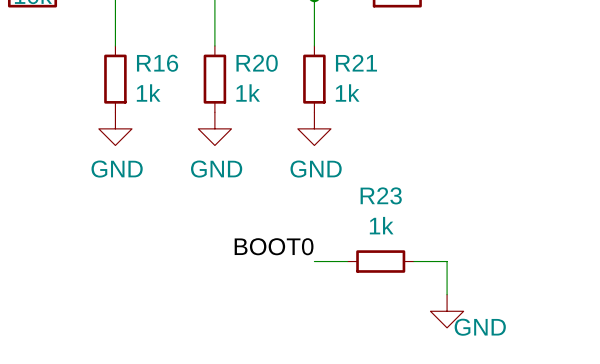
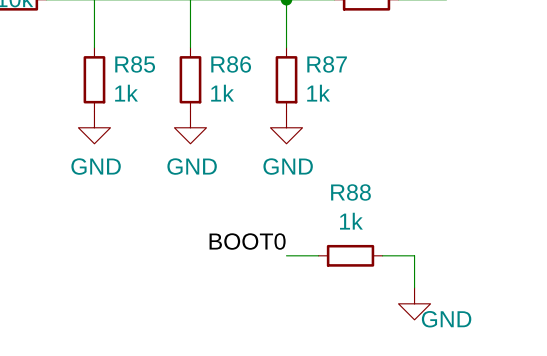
R16 name: R16 (157, 63) -> R85 (135, 64)
R20 name: R20 (257, 63) -> R86 (231, 64)
R21 name: R21 (356, 63) -> R87 (327, 64)
R23 name: R23 (381, 195) -> R88 (350, 192)

